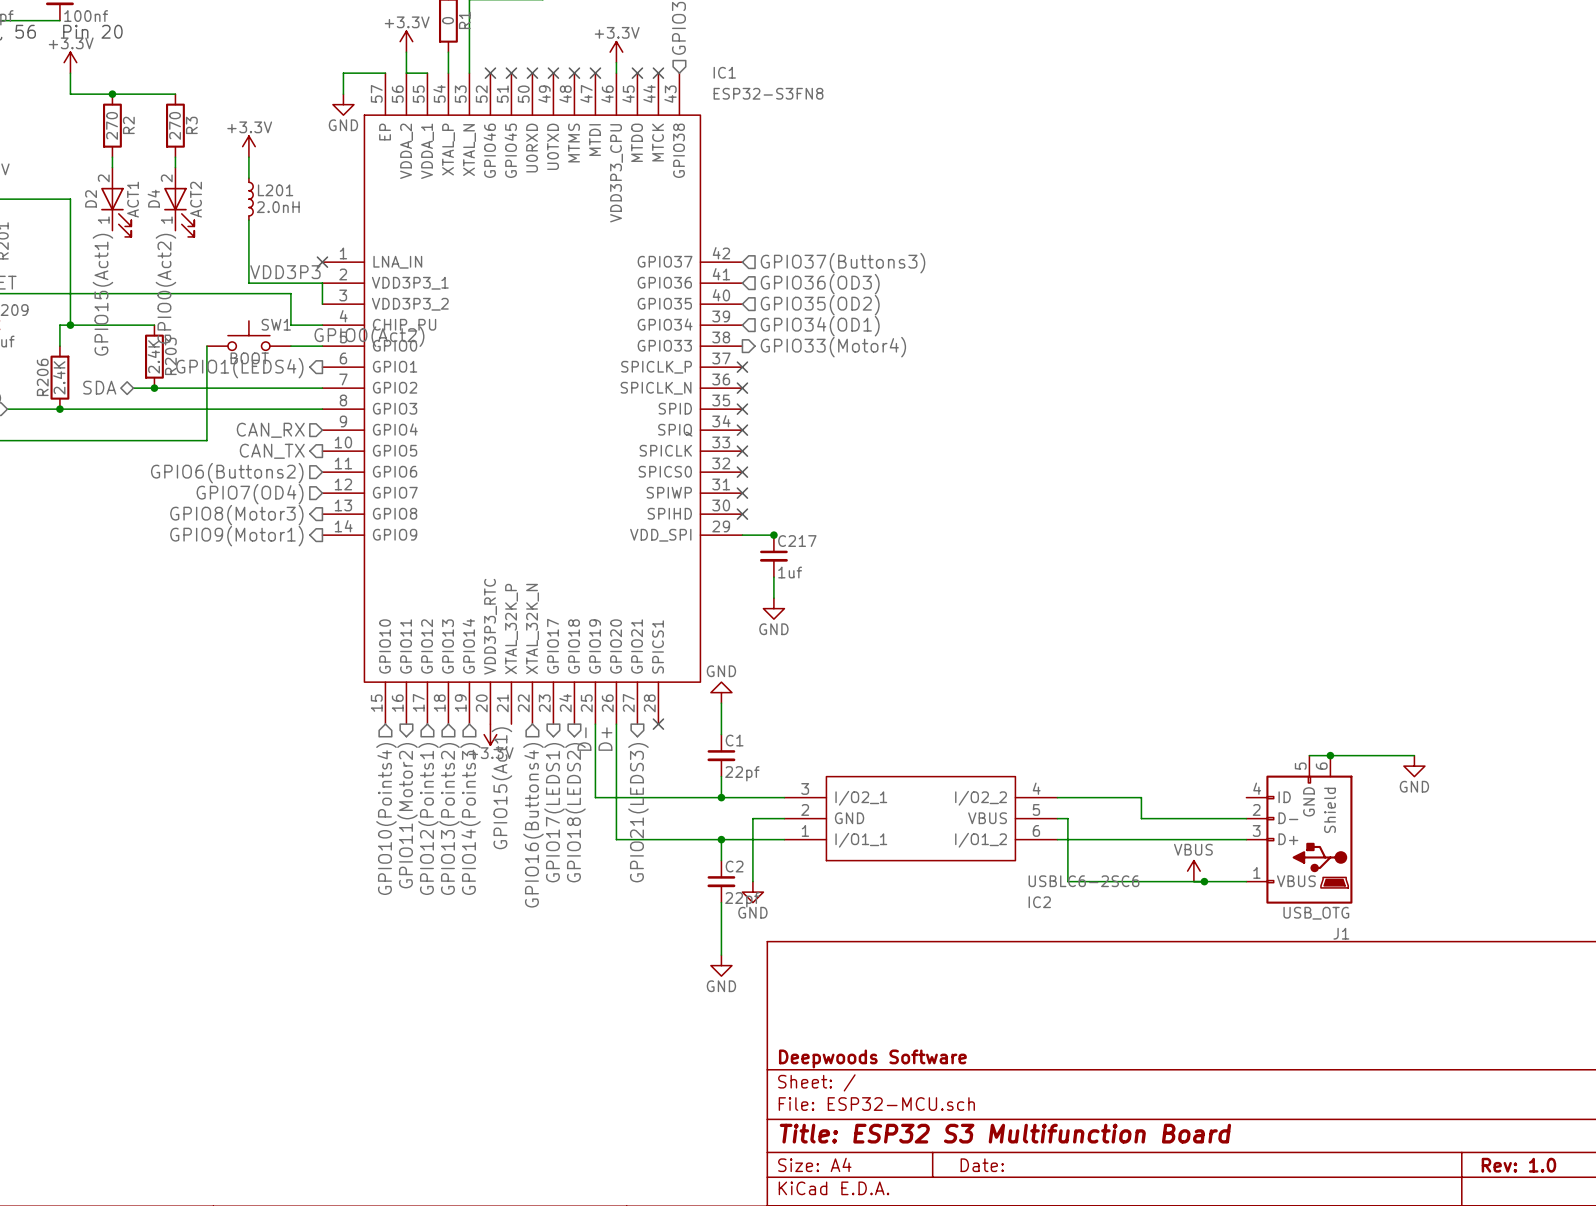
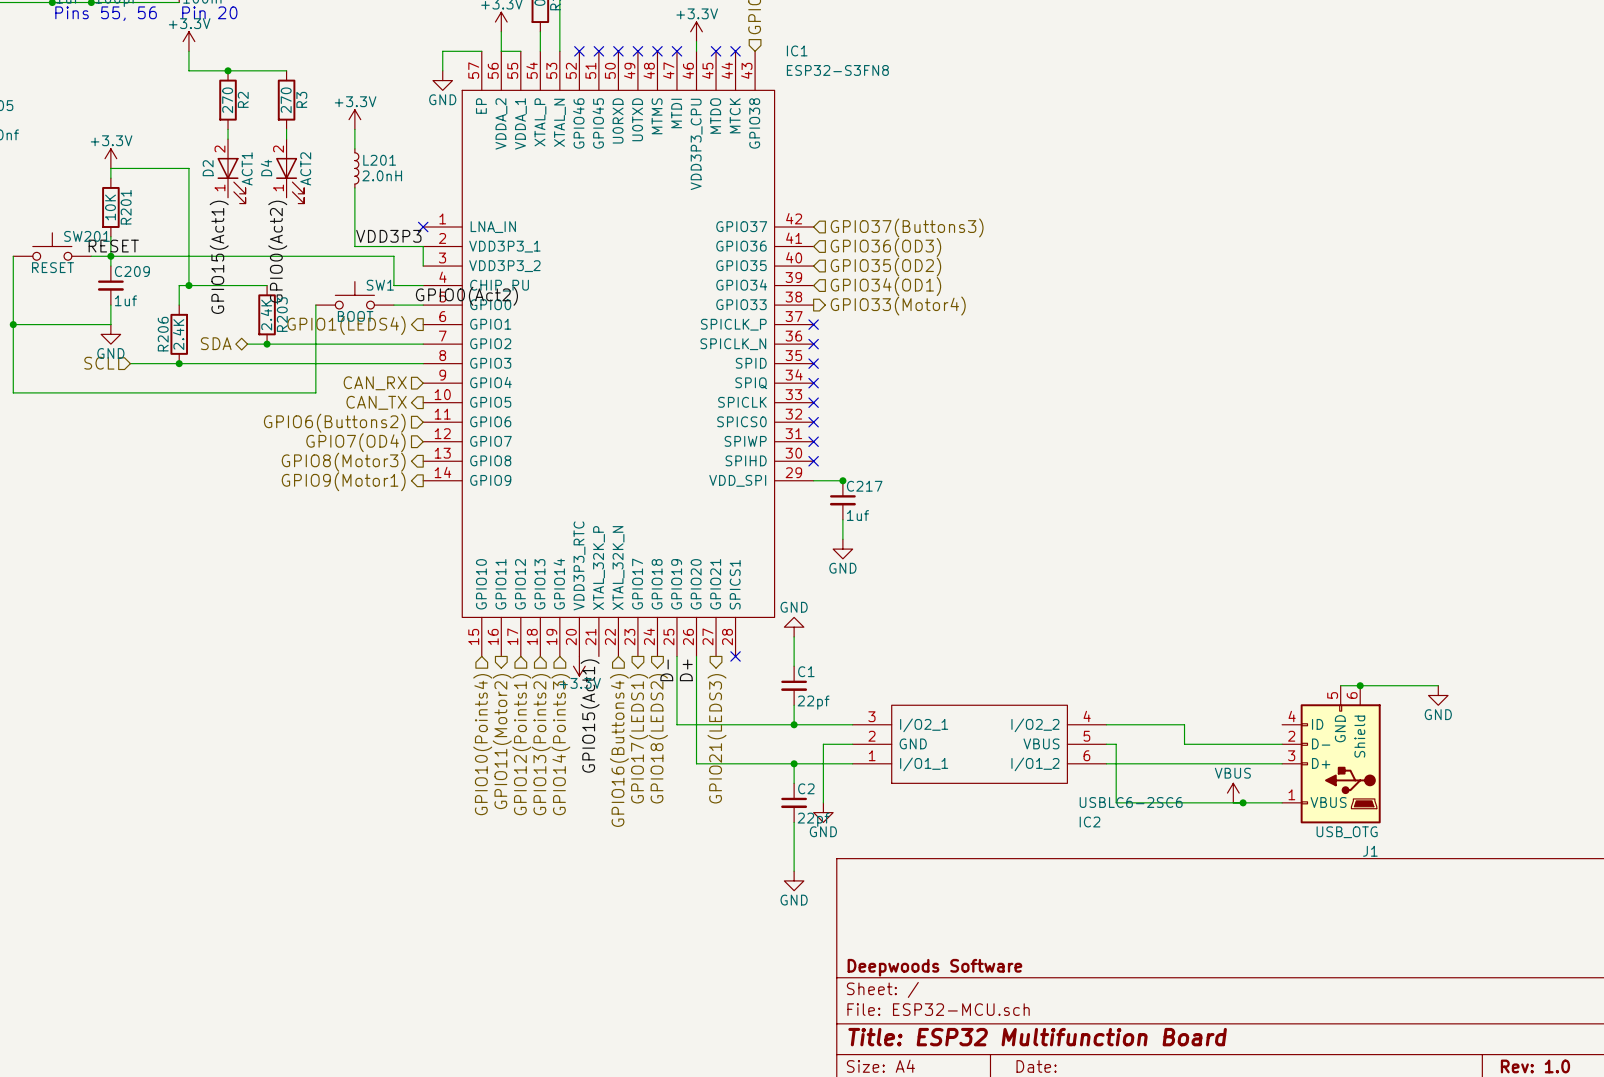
title block: Title: ESP32 S3 Multifunction Board (1005, 1133) -> Title: ESP32 Multifunction Board (1037, 1037)

